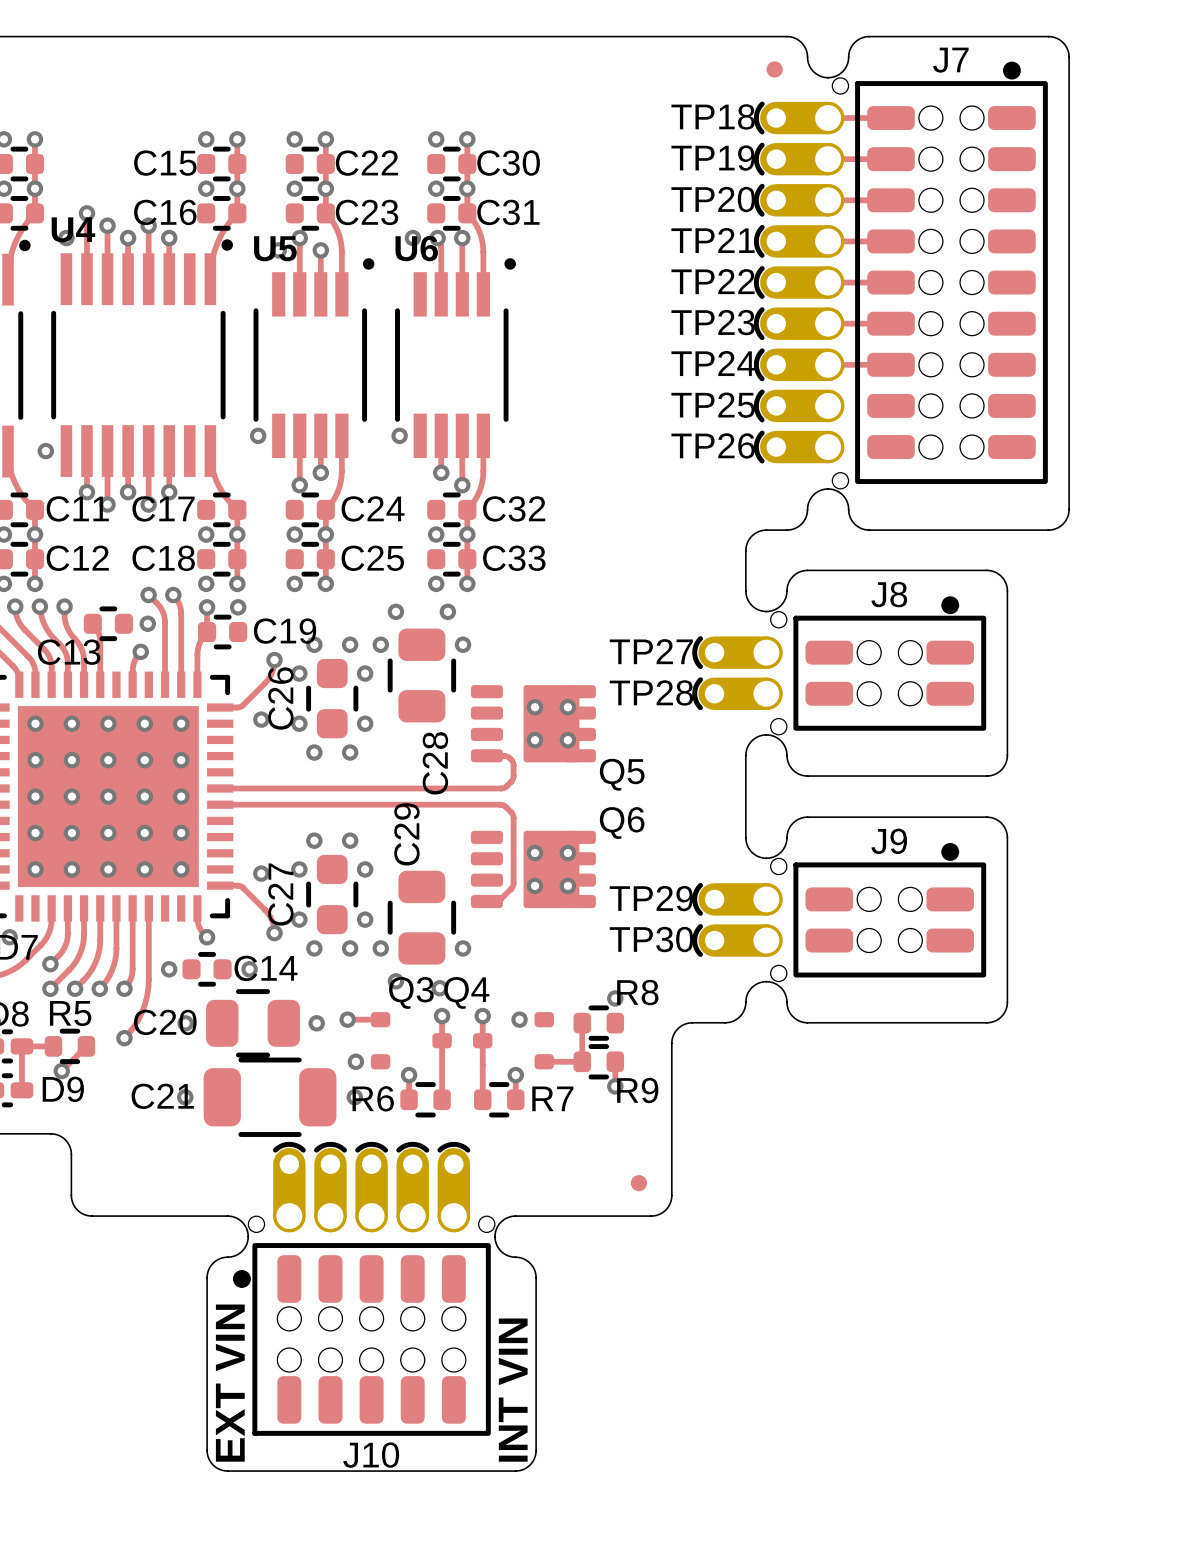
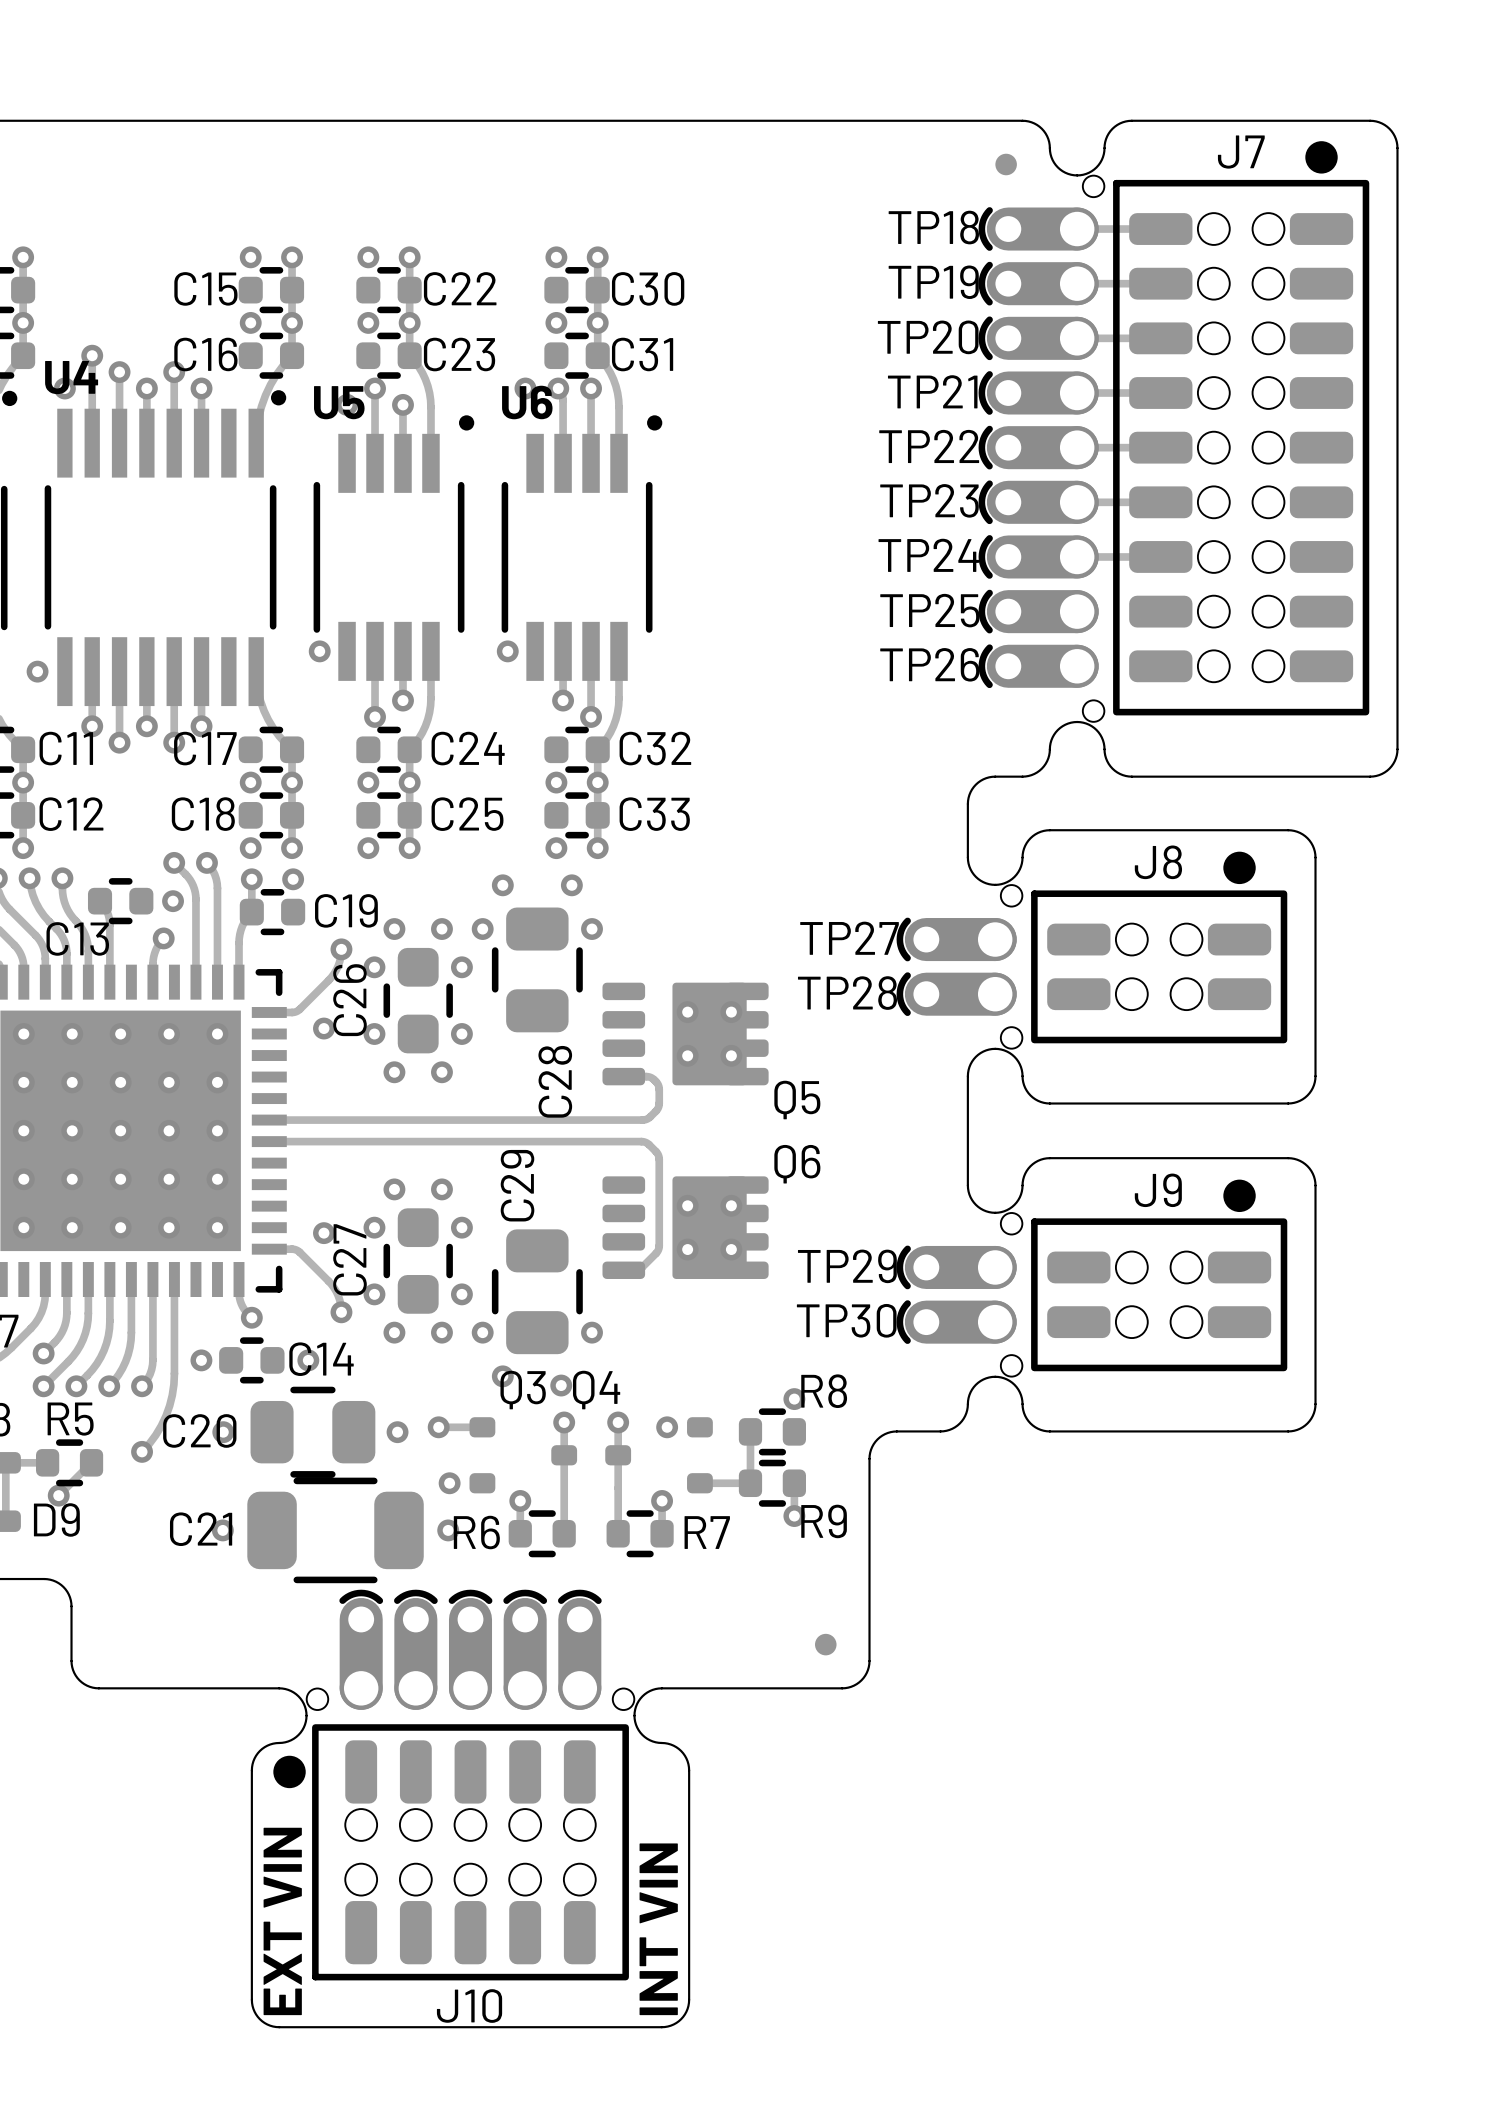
J7 footprint: [855, 61, 1048, 485] -> [1113, 141, 1370, 716]
J8 footprint: [793, 596, 987, 731] -> [1031, 851, 1288, 1044]
J9 footprint: [793, 843, 987, 978] -> [1031, 1179, 1288, 1372]
J10 footprint: [232, 1243, 491, 1436] -> [273, 1724, 629, 1981]

